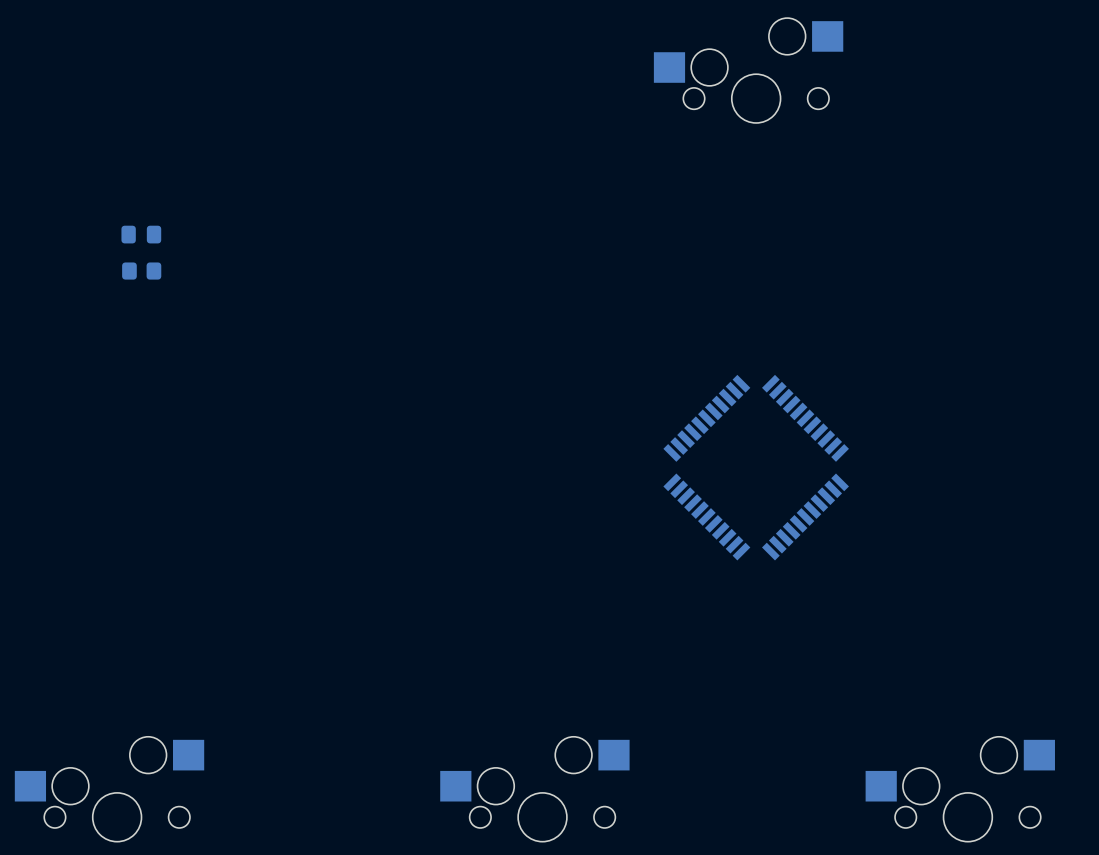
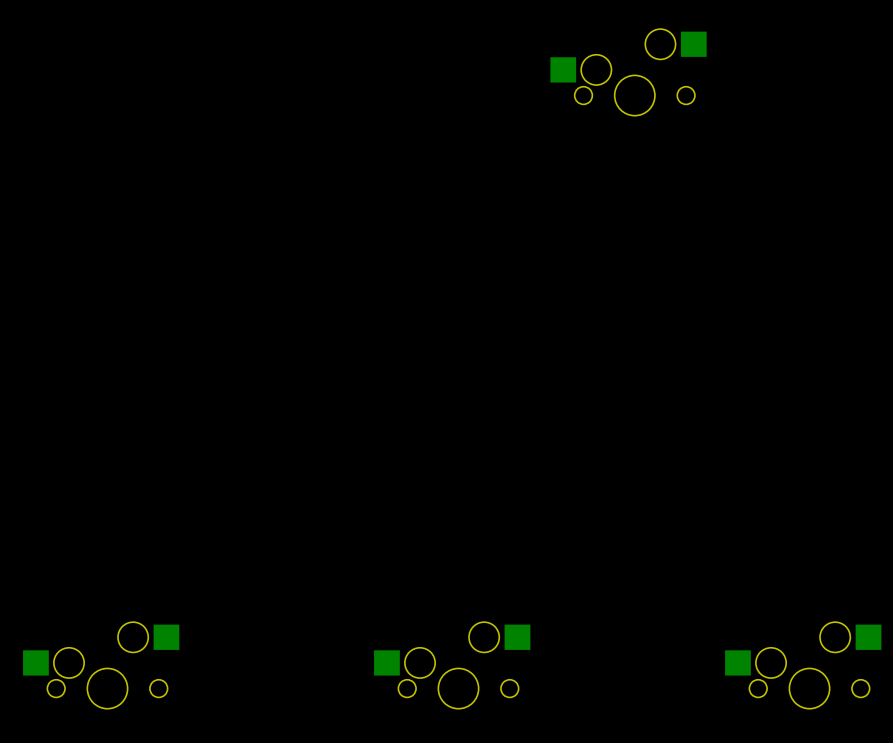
part: (141, 234) -> none
part: (141, 271) -> none
part: (756, 467) -> none

